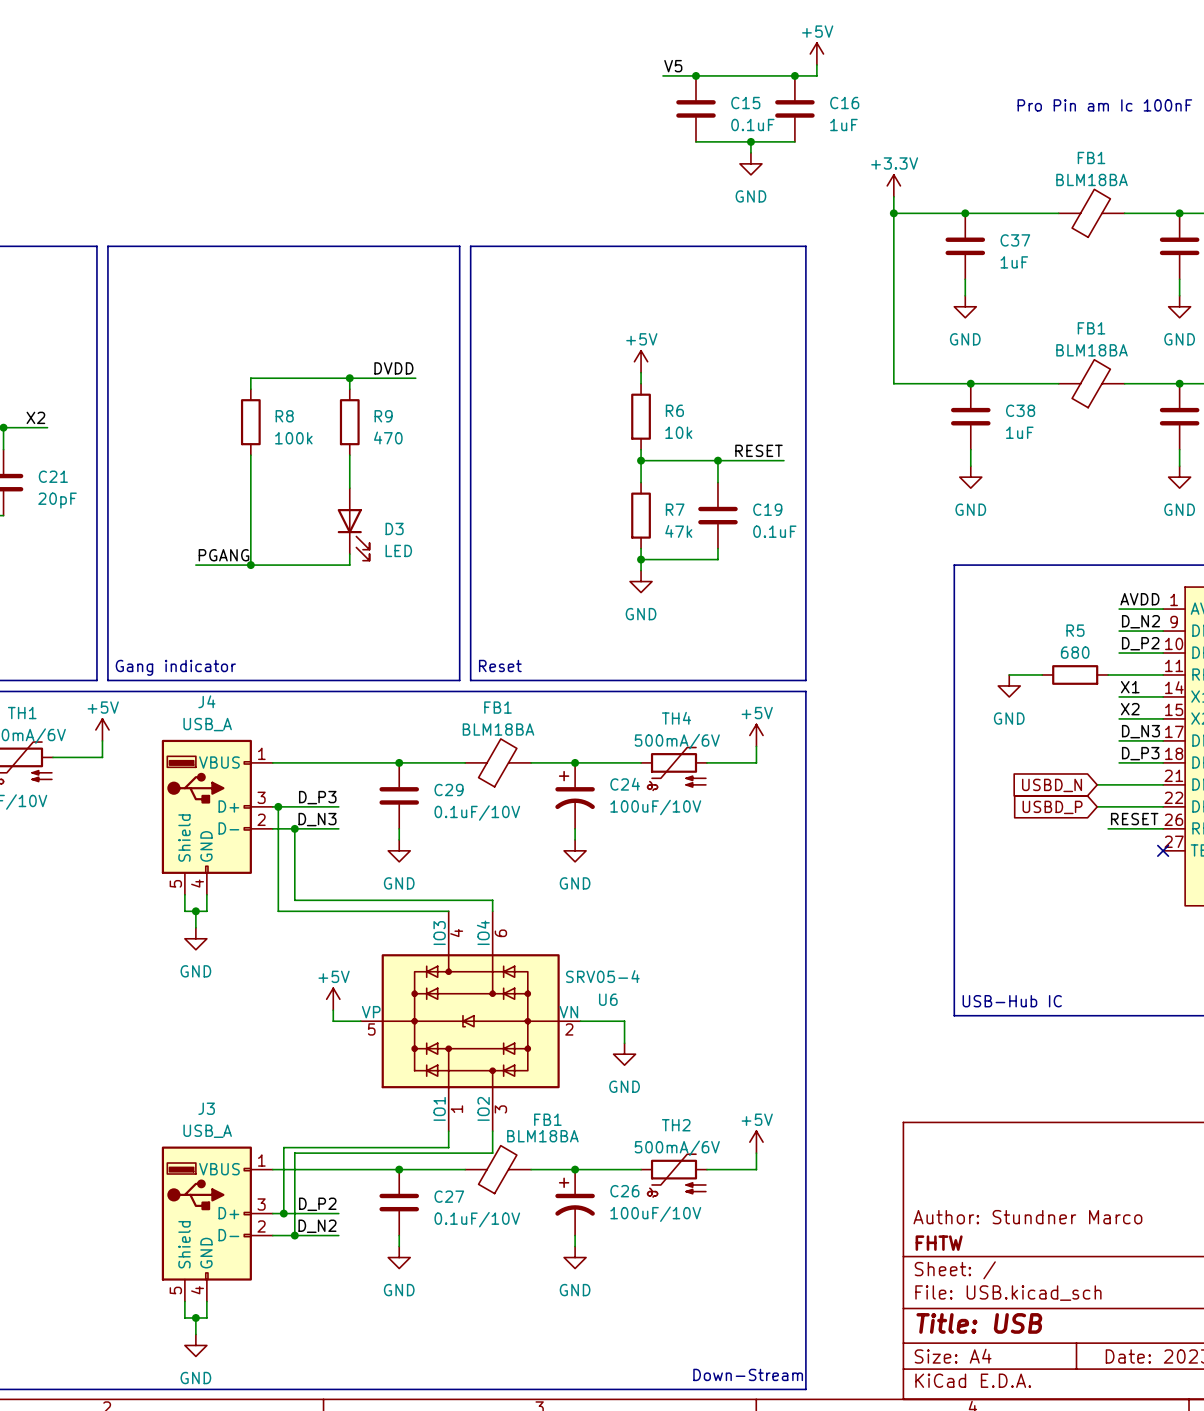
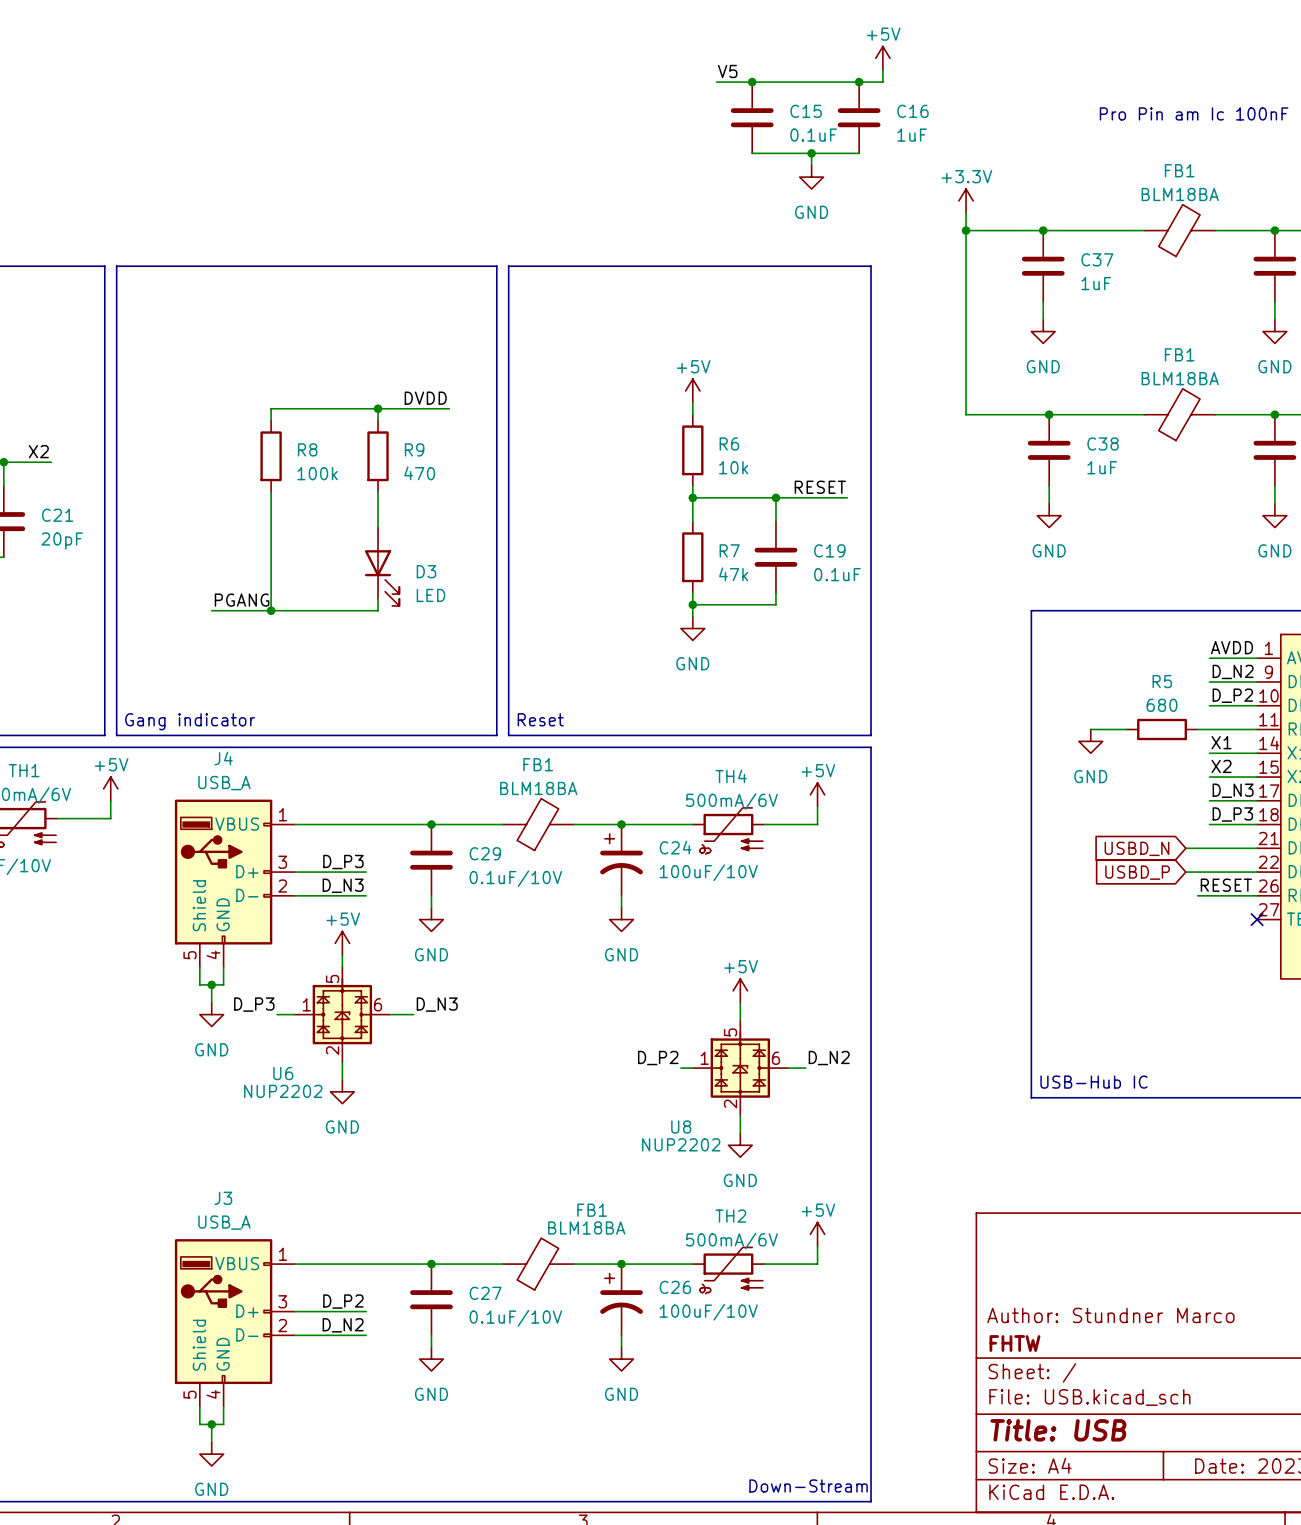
wire: (278, 806) (278, 911) (448, 911) -> none
junction: (278, 806) -> none
wire: (294, 828) (294, 900) (492, 900) (492, 911) -> none
junction: (294, 828) -> none
wire: none -> (342, 955) (342, 967)
U6 symbol: [360, 911, 581, 1132] -> [294, 967, 390, 1063]
power symbol: none -> +5V (740, 990)
wire: none -> (740, 1002) (740, 1020)
label: none -> D_P3 (254, 1004)
label: none -> D_N3 (437, 1004)
wire: none -> (277, 1014) (294, 1014)
wire: none -> (389, 1014) (413, 1014)
U6 value: SRV05-4 (602, 976) -> NUP2202 (283, 1091)
label: none -> D_P2 (658, 1058)
label: none -> D_N2 (829, 1058)
wire: none -> (342, 1062) (342, 1079)
wire: none -> (680, 1068) (692, 1068)
U8: none -> NUP2202 (740, 1068)
wire: none -> (787, 1068) (805, 1068)
power symbol position: +5V (333, 999) -> +5V (342, 943)
U6 name position: U6 (608, 999) -> U6 (283, 1073)
power symbol: none -> GND (342, 1091)
wire: (333, 1010) (333, 1021) (360, 1021) -> none
wire: (580, 1021) (624, 1021) (624, 1043) -> none
wire: none -> (740, 1115) (740, 1133)
power symbol position: GND (624, 1054) -> GND (740, 1145)
wire: (448, 1131) (448, 1147) (283, 1147) (283, 1213) -> none
wire: (492, 1131) (492, 1153) (294, 1153) (294, 1235) -> none
junction: (283, 1213) -> none
junction: (294, 1235) -> none

